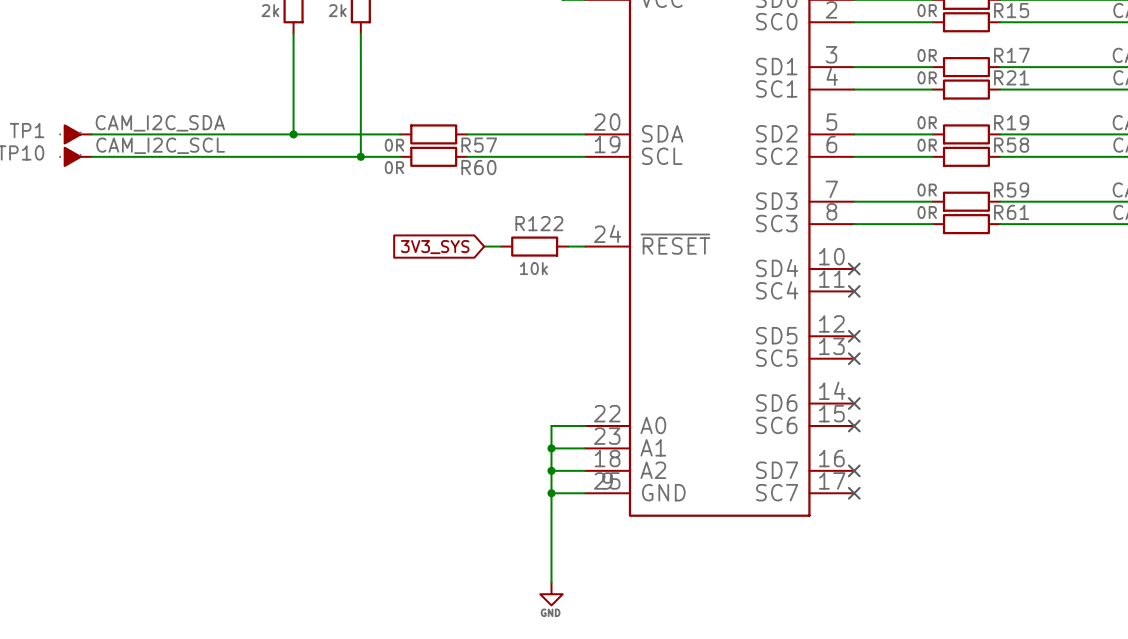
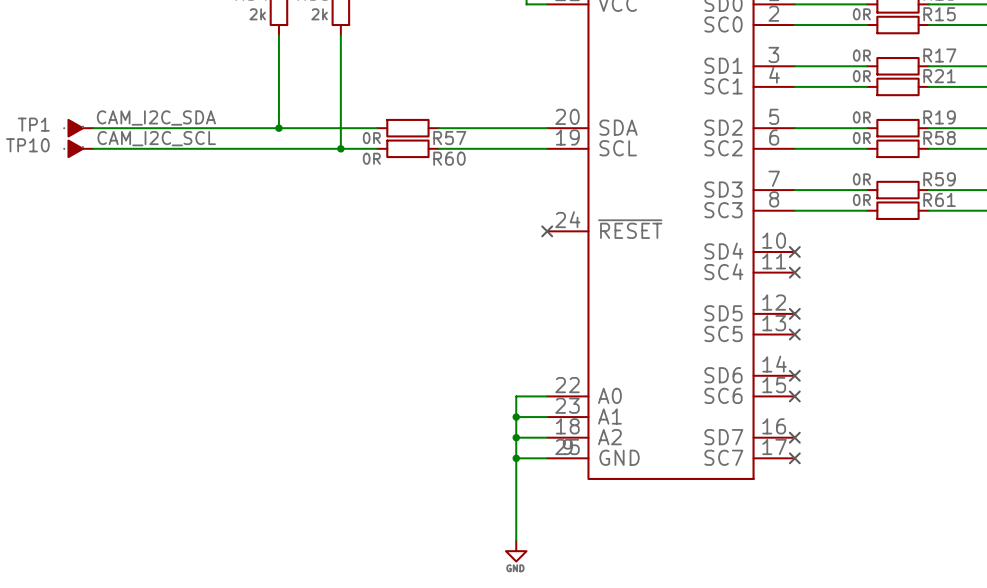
wire: (484, 246) (501, 246) -> none
R122: (534, 246) -> none
wire: (568, 246) (585, 246) -> none
no-connect mark: none -> (547, 231)
global label: 3V3_SYS (435, 247) -> none

